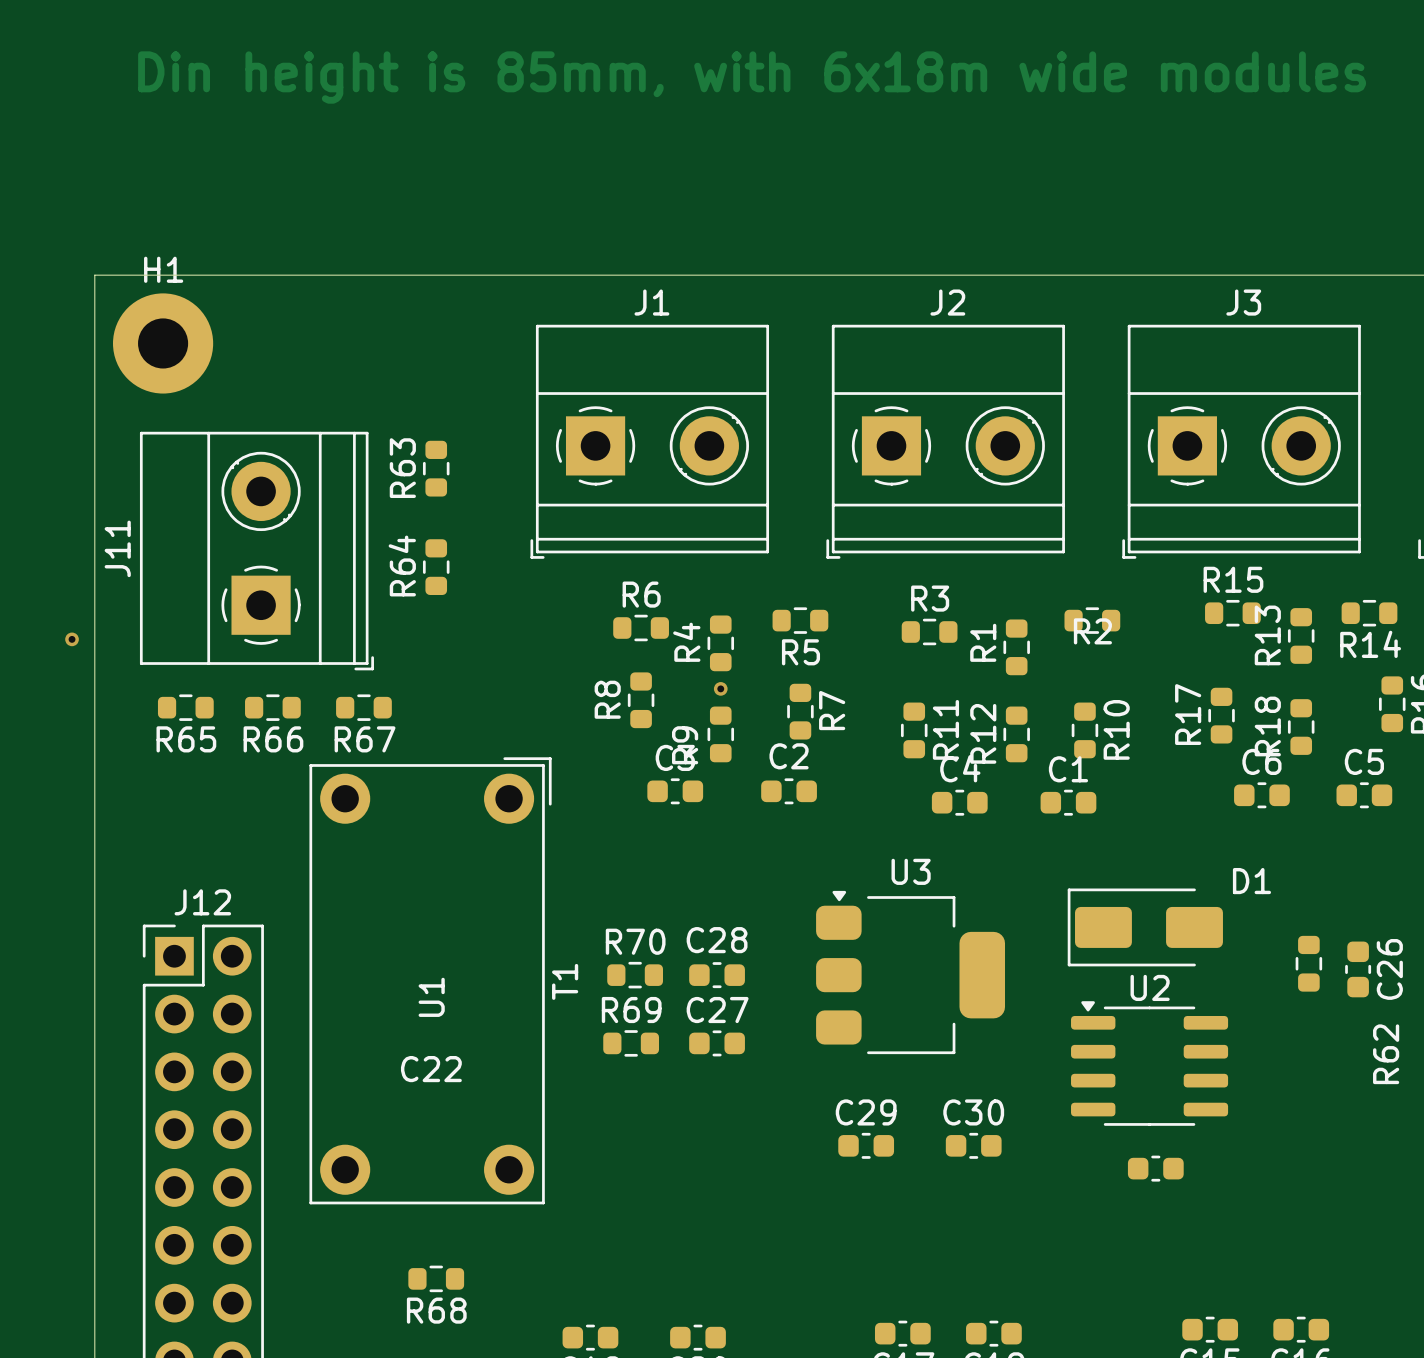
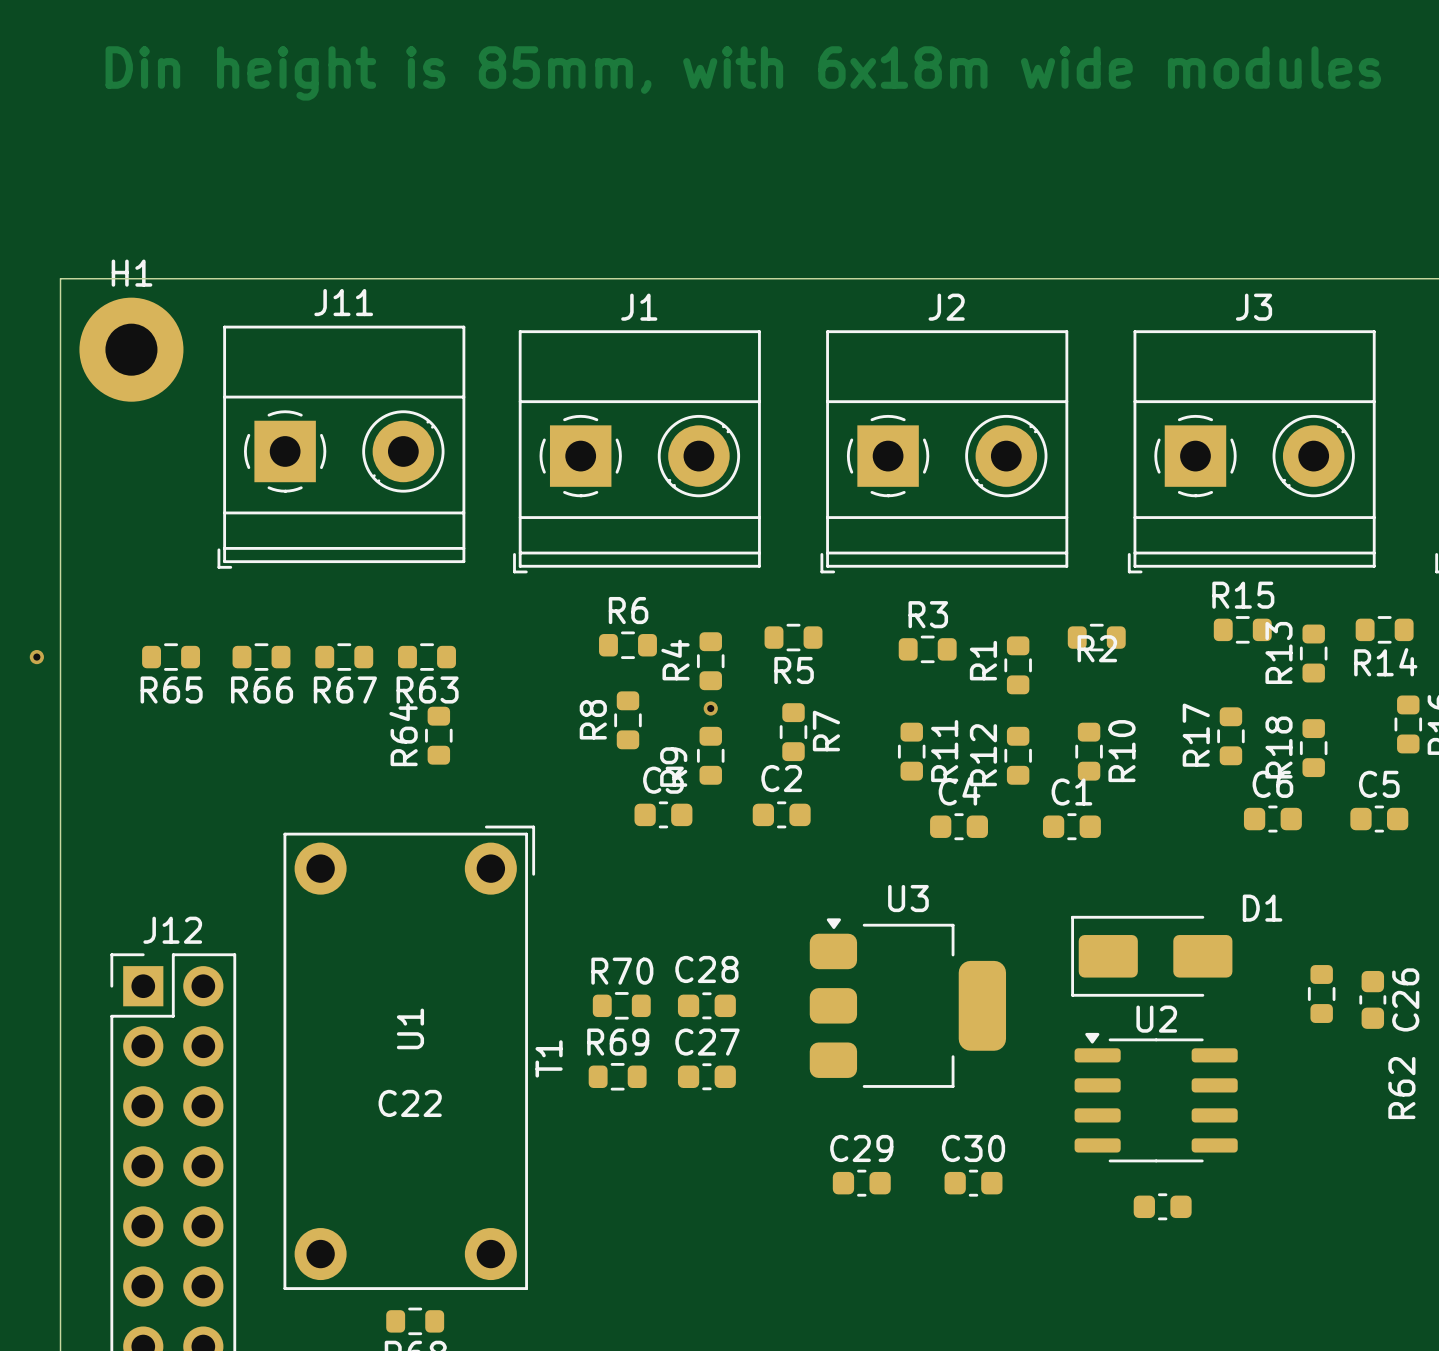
R63 name position: R63 (402, 468) -> R63 (427, 689)
R63 rotation: 0° (436, 468) -> 90° clockwise (427, 657)
R63 position: (436, 468) -> (427, 657)
J11 rotation: 0° (256, 551) -> 90° clockwise (341, 447)
J11 position: (256, 551) -> (341, 447)
R64 position: (436, 567) -> (438, 735)
R65 position: (185, 707) -> (171, 657)
R66 position: (272, 707) -> (261, 657)
R67 position: (363, 707) -> (344, 657)
T1 position: (430, 980) -> (409, 1057)

